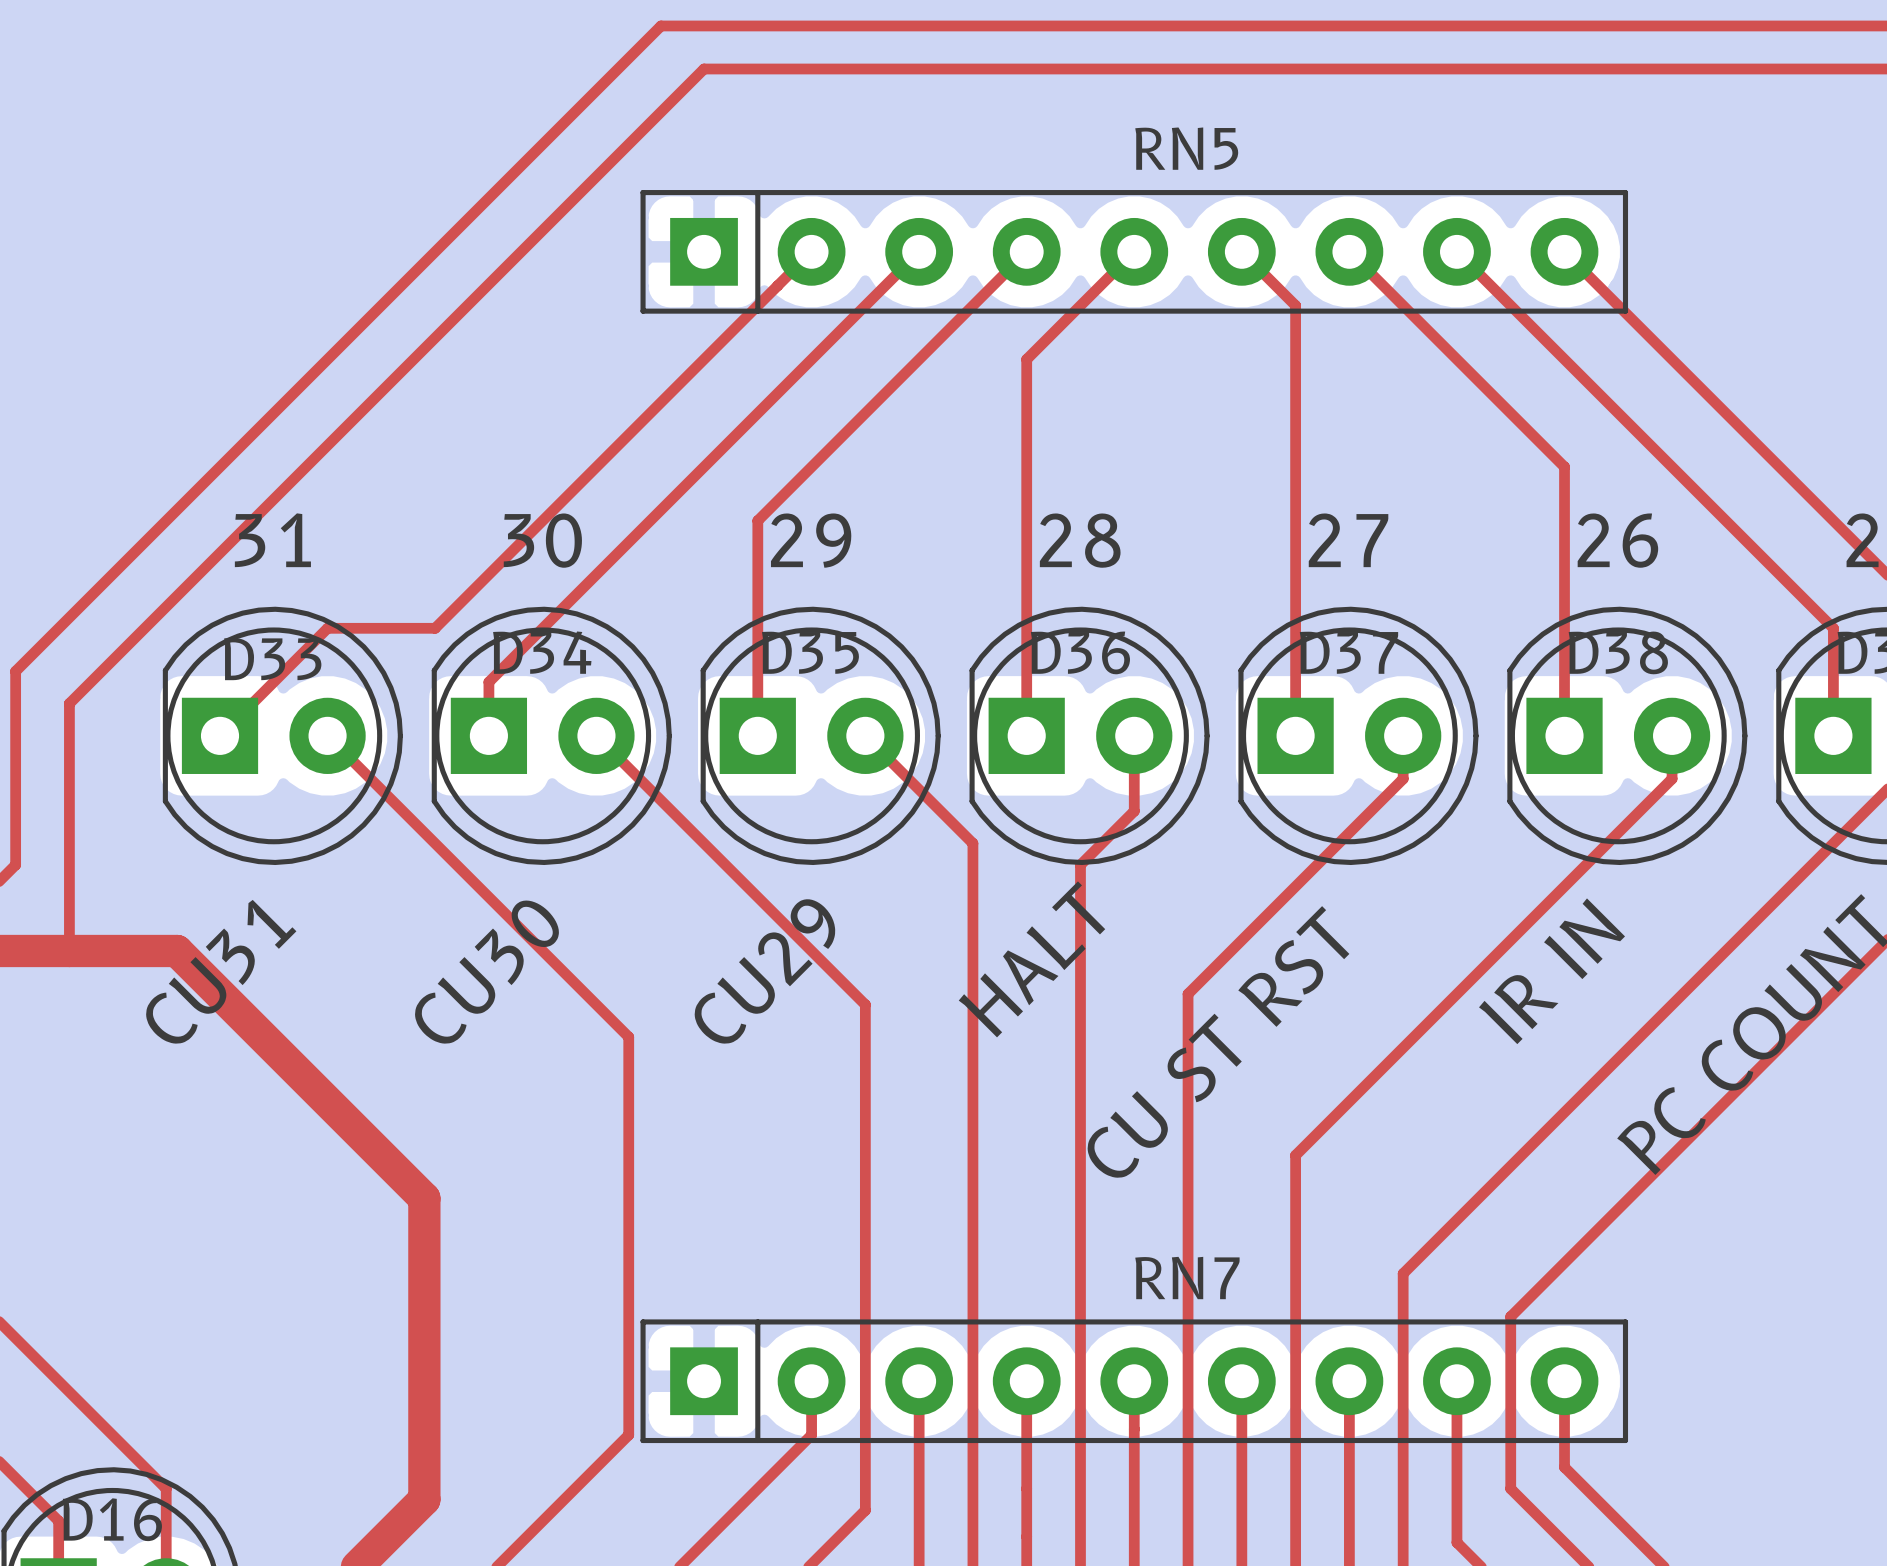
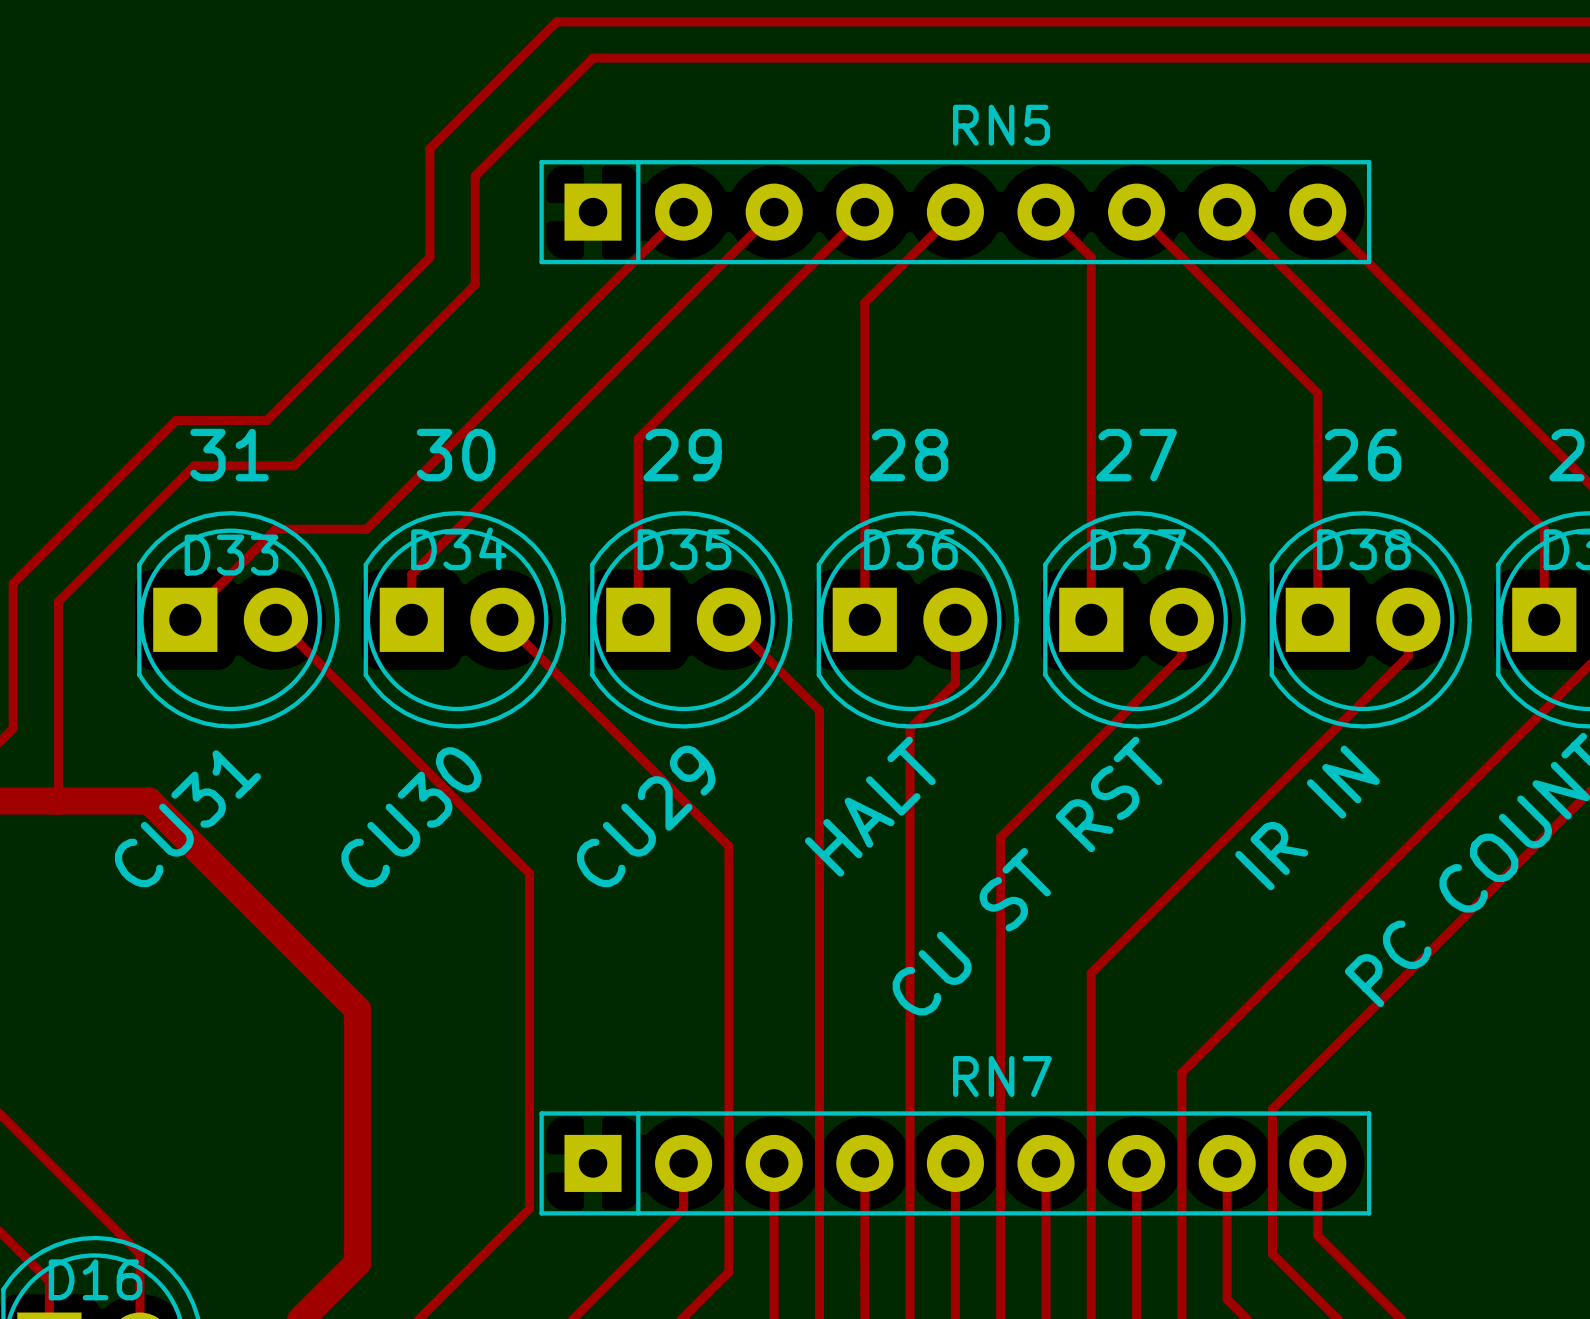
top track: (510, 176) (15, 671) (15, 692) -> (429, 148) (429, 257) (266, 420) (176, 420) (13, 583)
top track: (564, 208) (69, 703) (69, 714) -> (475, 175) (475, 284) (294, 465) (194, 465) (58, 601)

